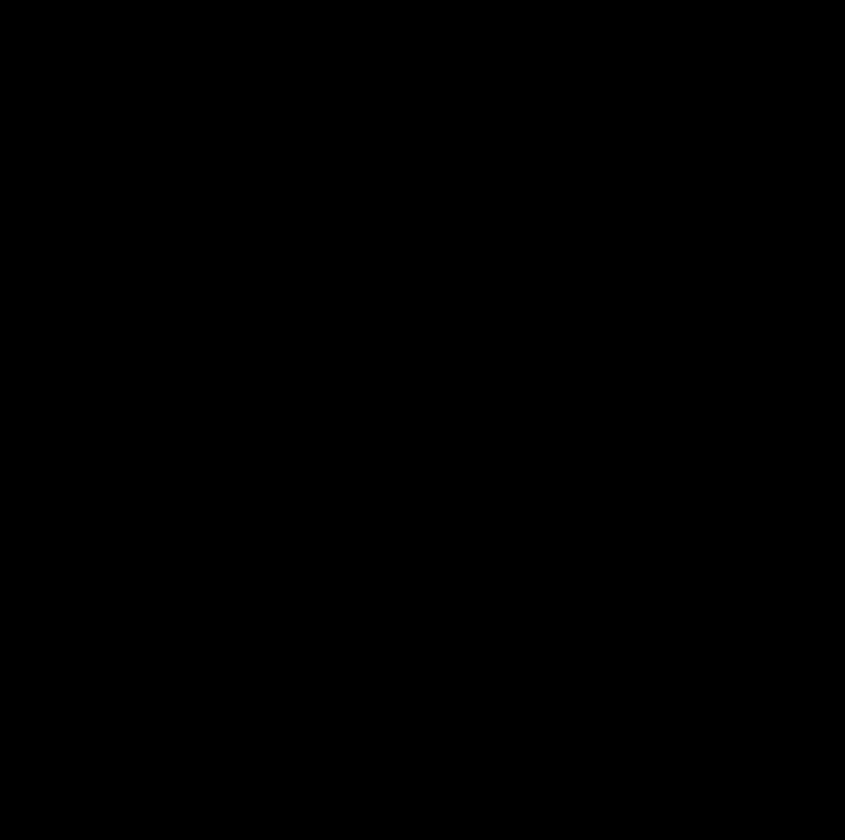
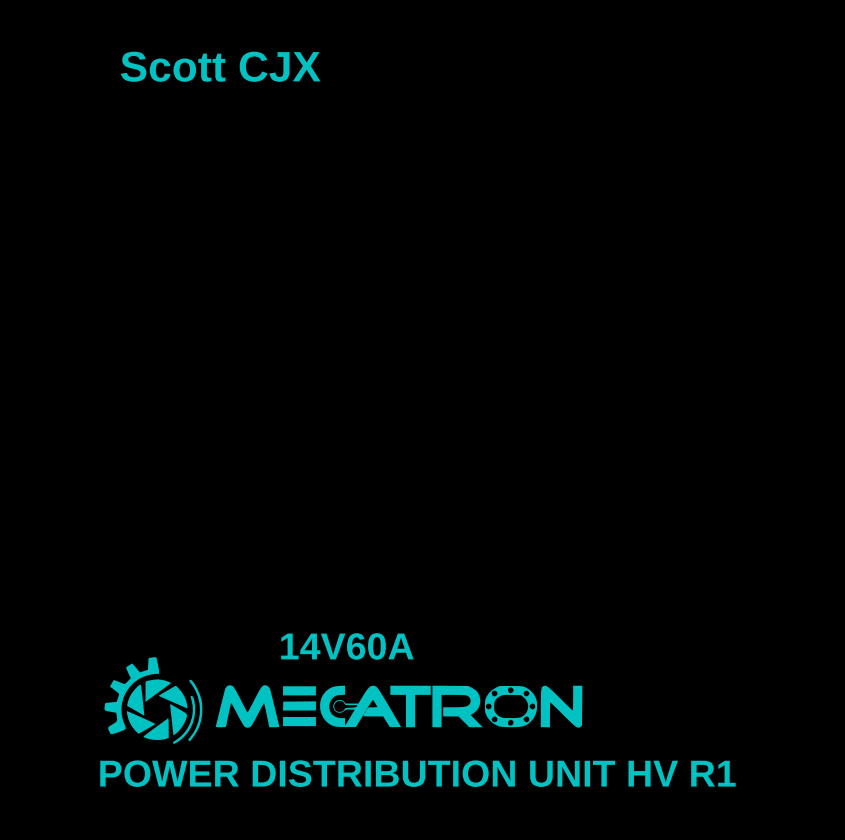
text: none -> Scott CJX (220, 66)
text: none -> 14V60A (347, 646)
drawing: none -> [104, 657, 583, 744]
text: none -> POWER DISTRIBUTION UNIT HV R1 (417, 773)

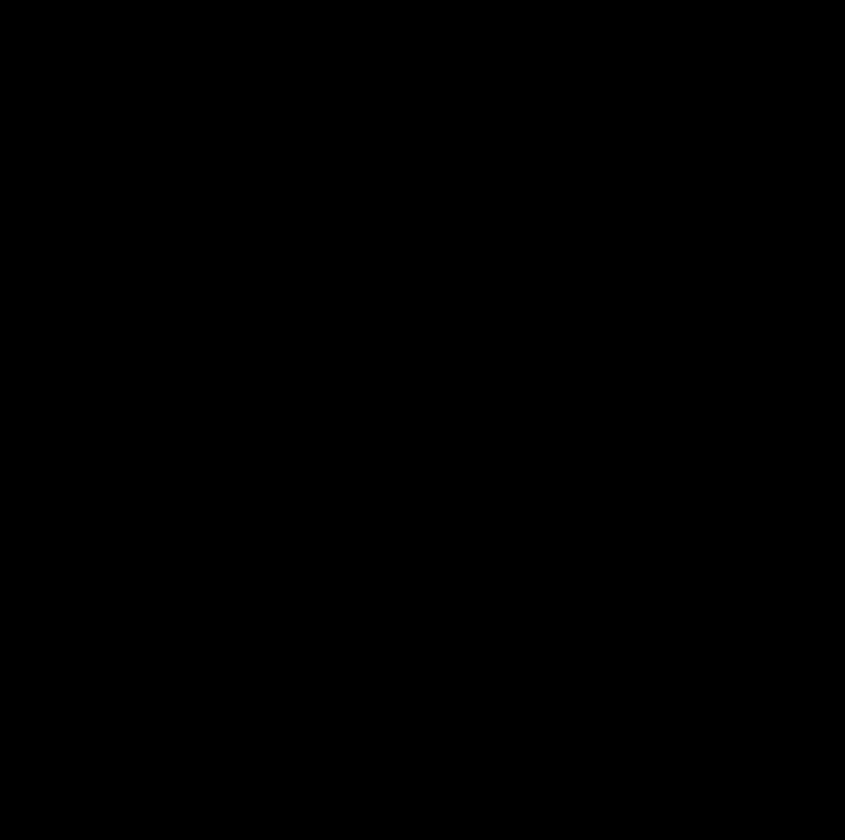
text: Scott CJX (220, 66) -> none
text: 14V60A (347, 646) -> none
drawing: [104, 657, 583, 744] -> none
text: POWER DISTRIBUTION UNIT HV R1 (417, 773) -> none

